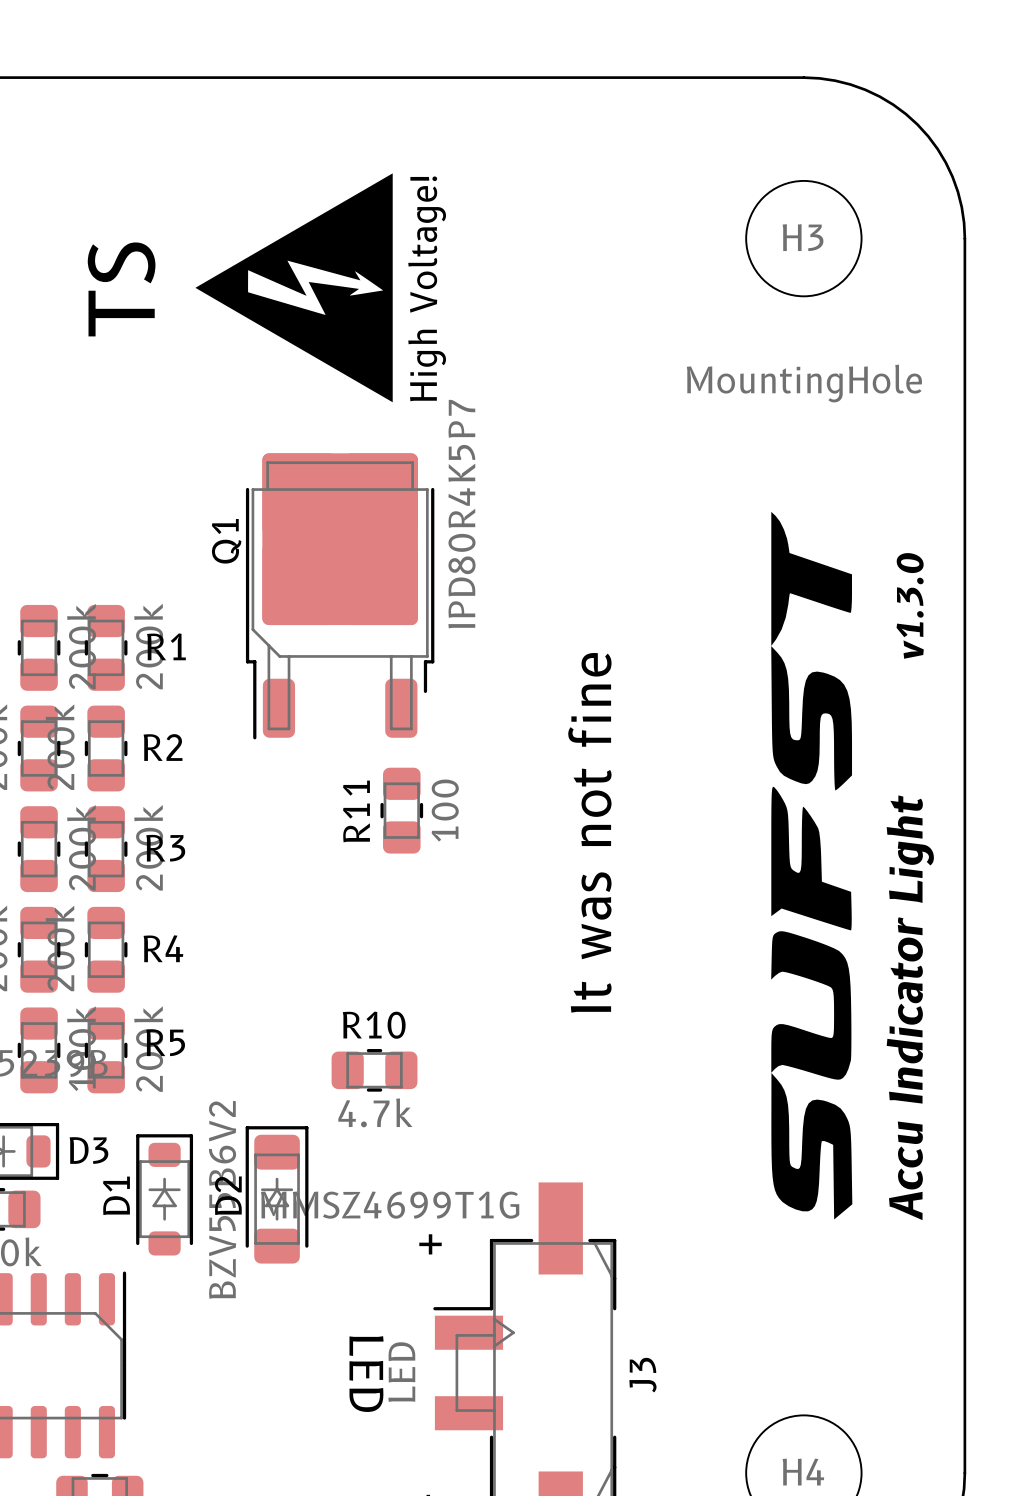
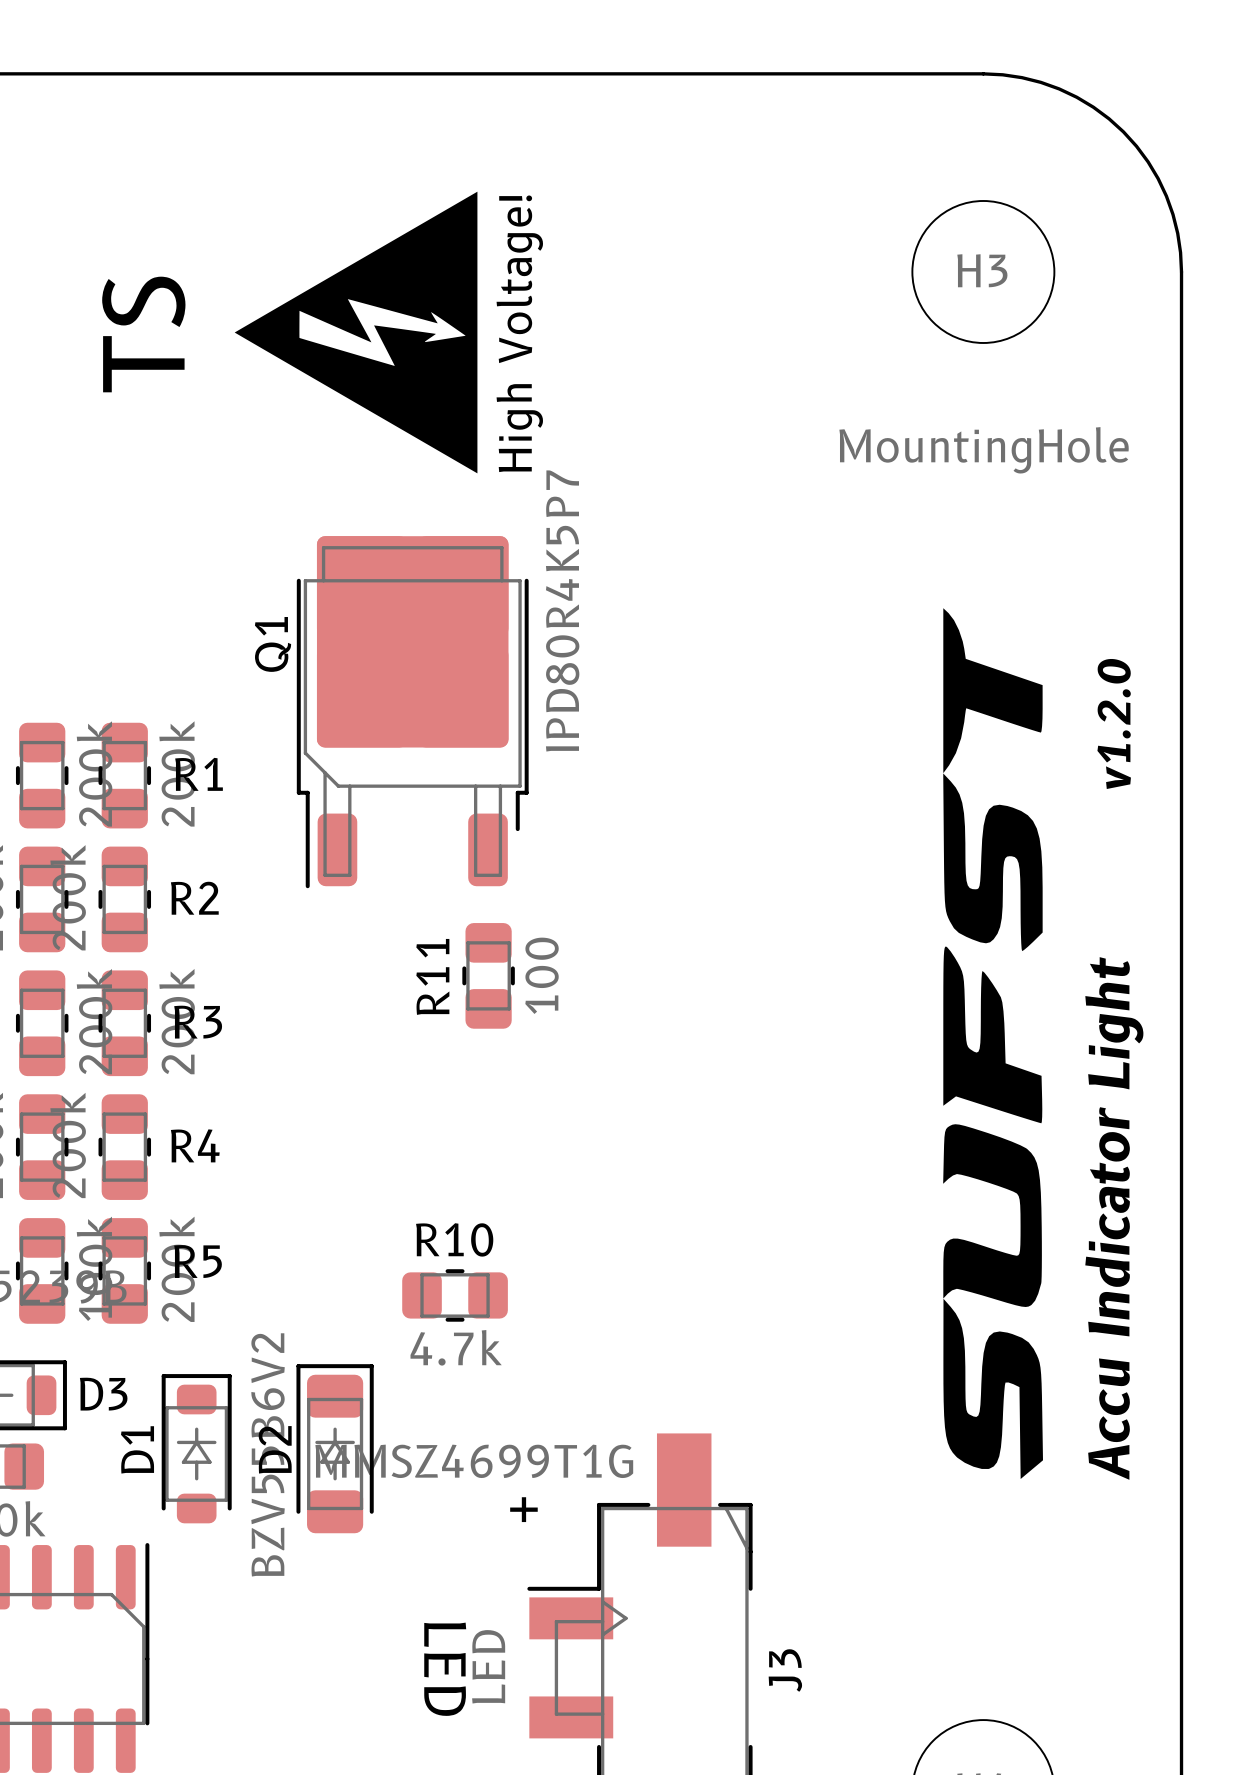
text: v1.3.0 (910, 605) -> v1.2.0 (1114, 723)
text: It was not fine (589, 832) -> none

